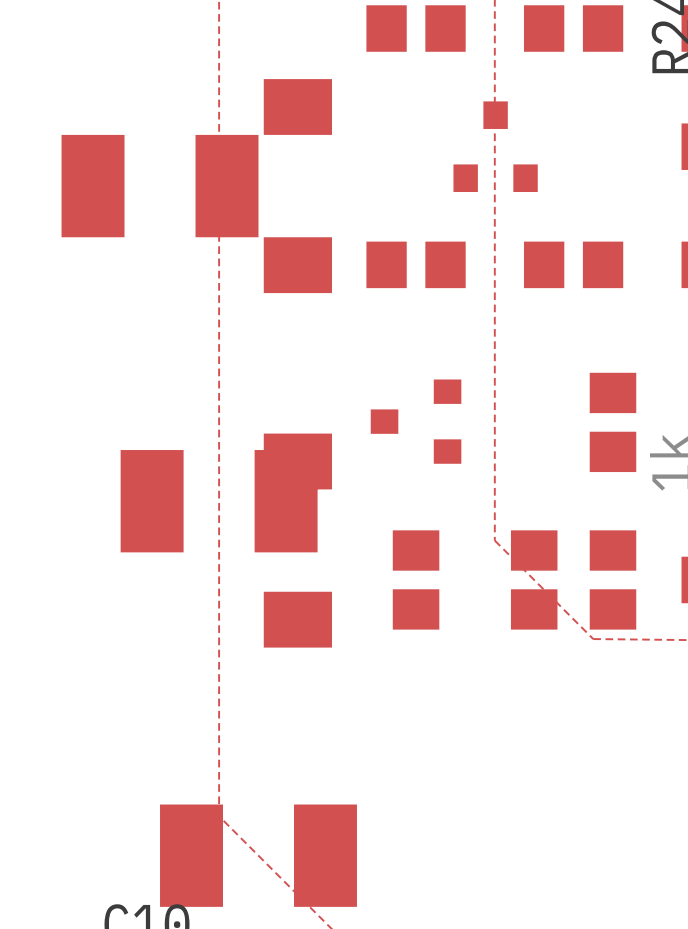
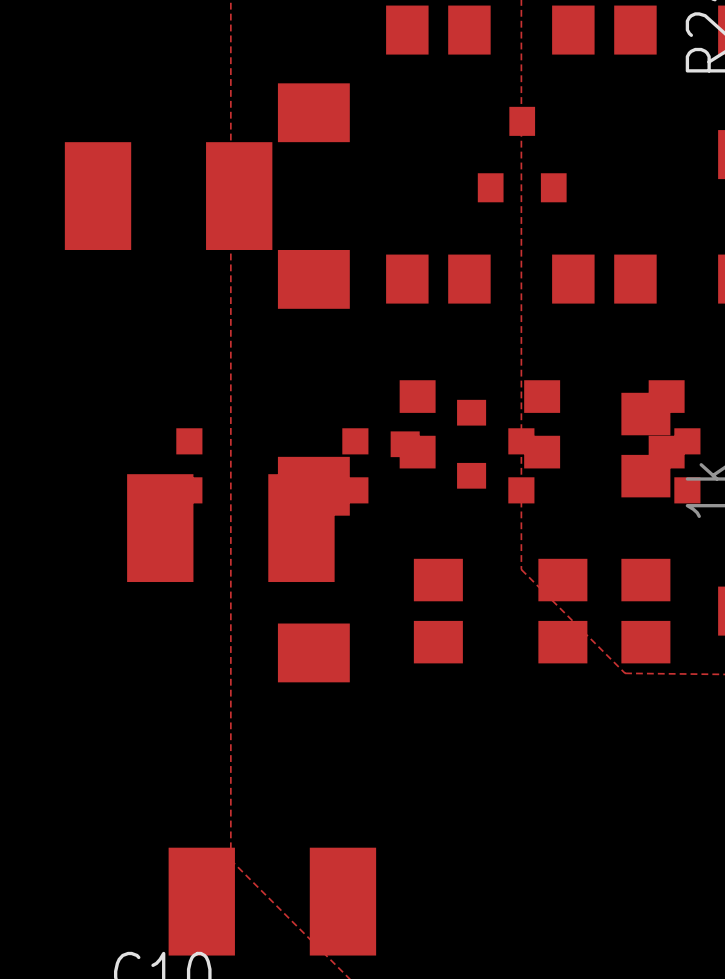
part: none -> (417, 424)
part: none -> (542, 424)
part: none -> (666, 424)
part: none -> (189, 465)
part: none -> (355, 465)
part: none -> (521, 465)
part: none -> (687, 465)

